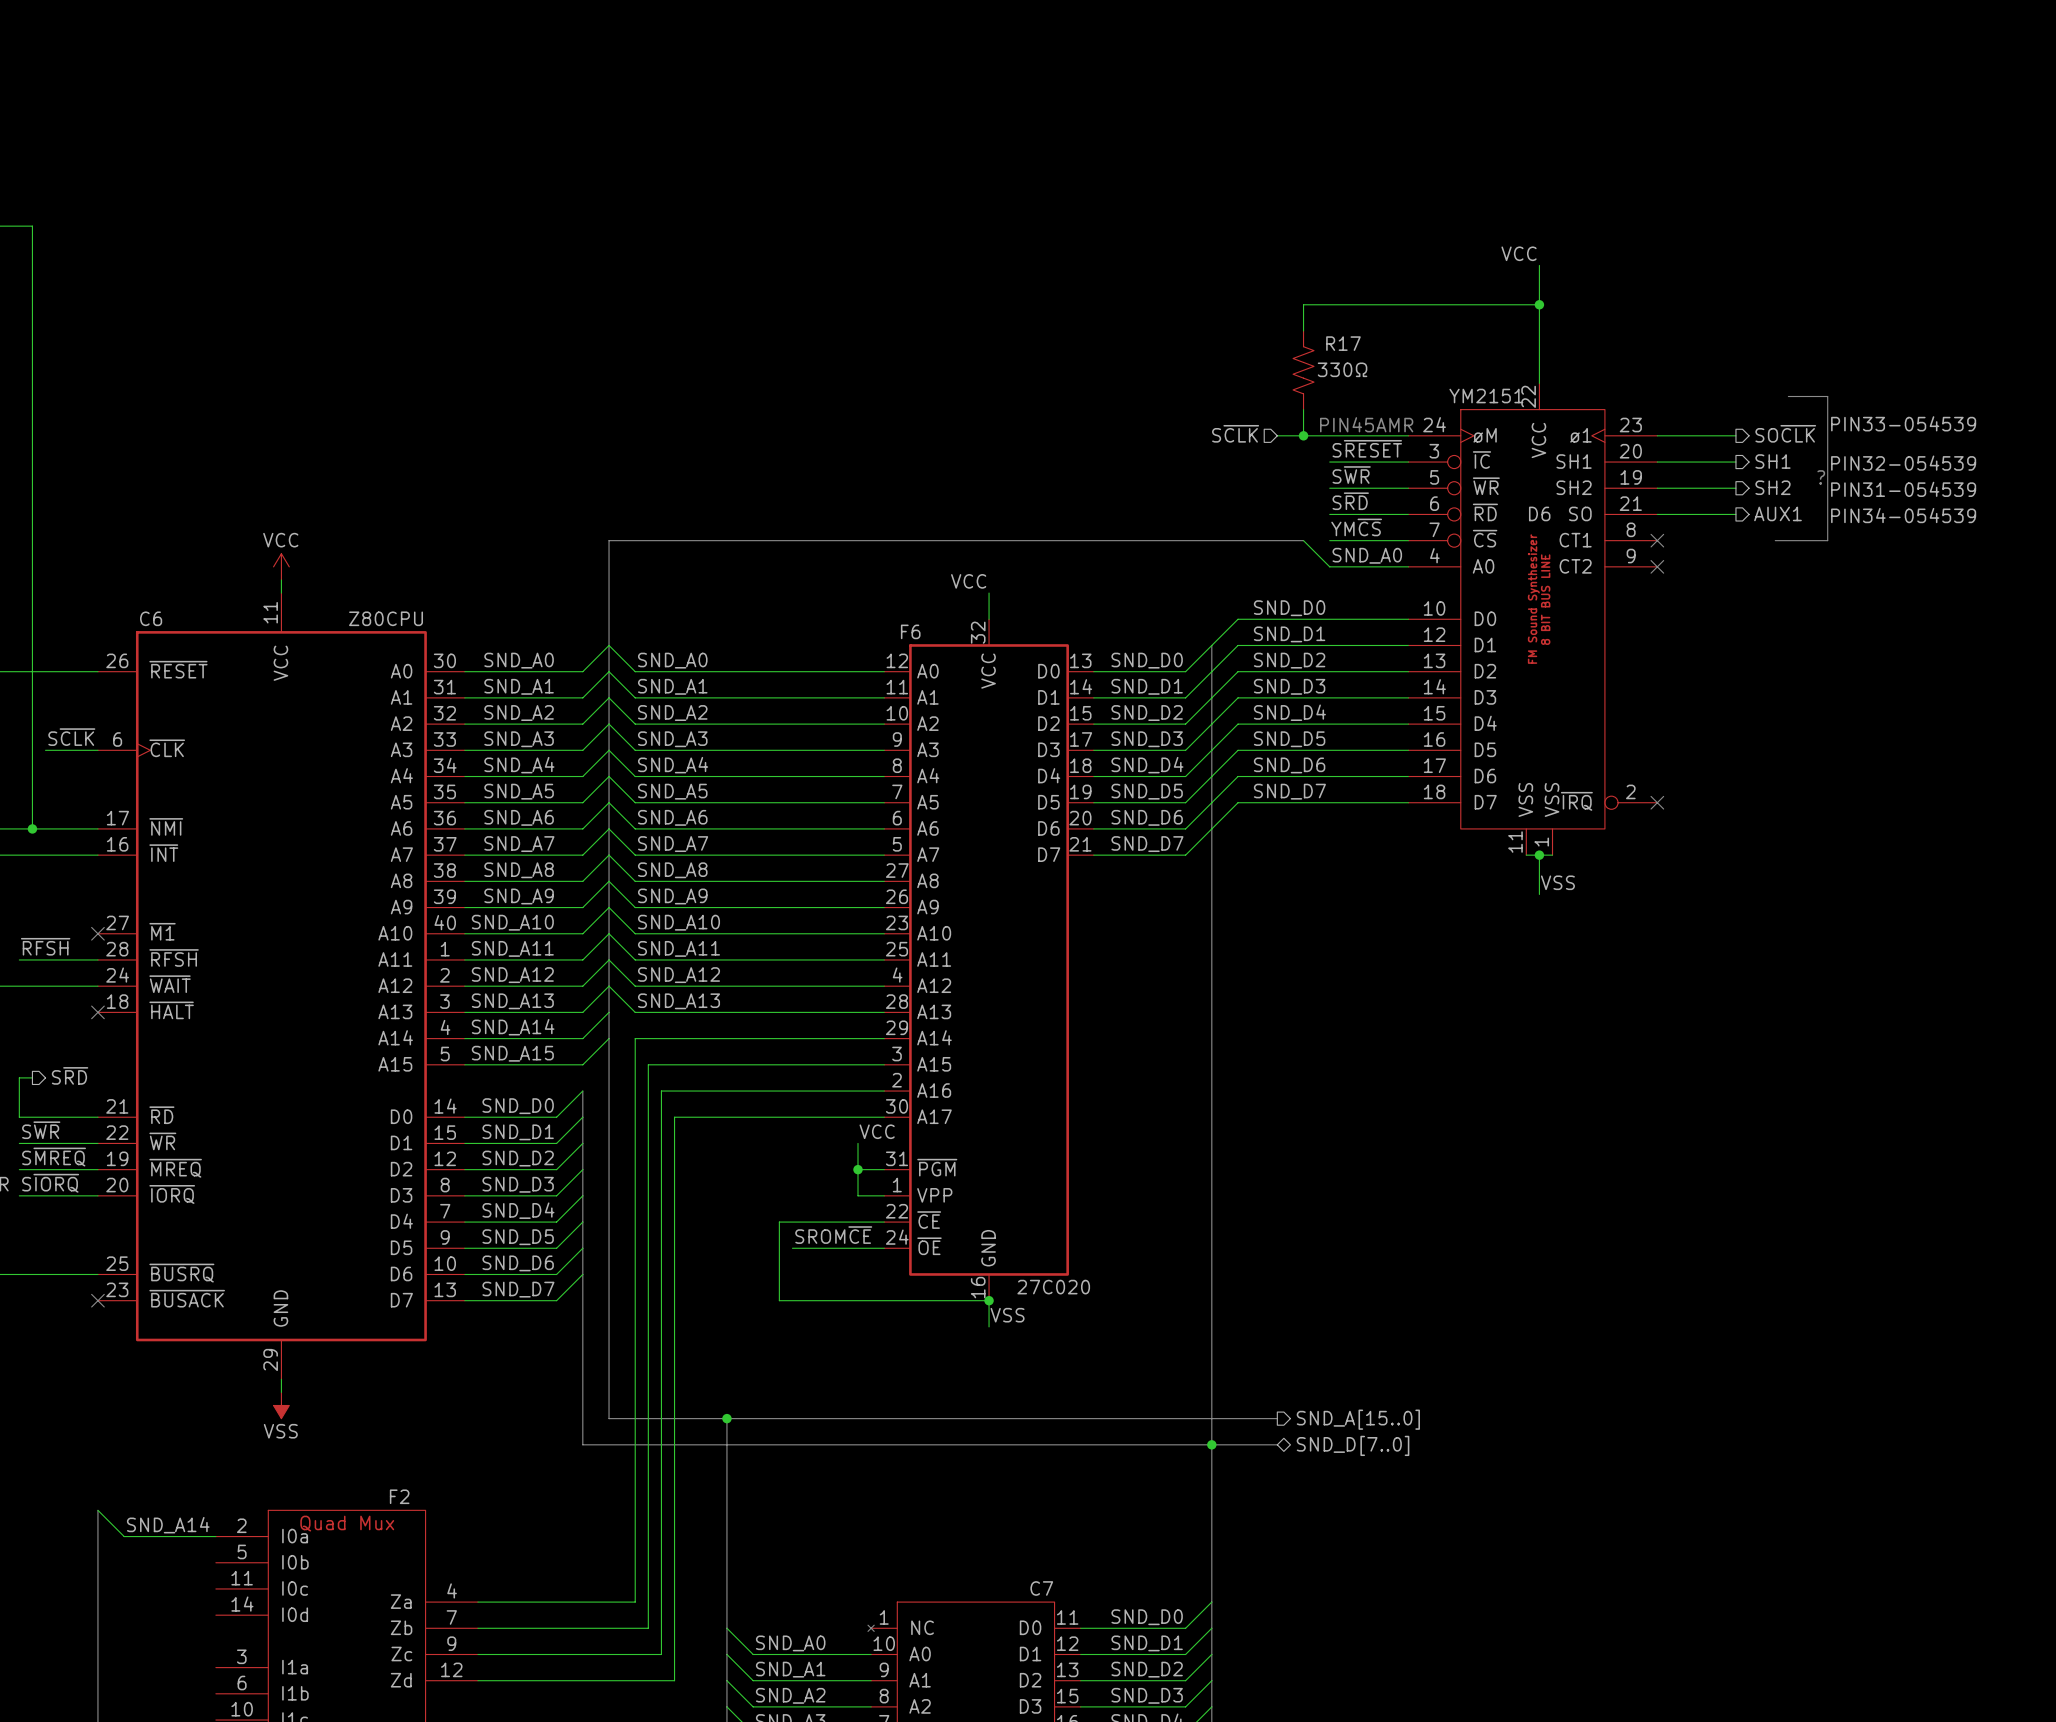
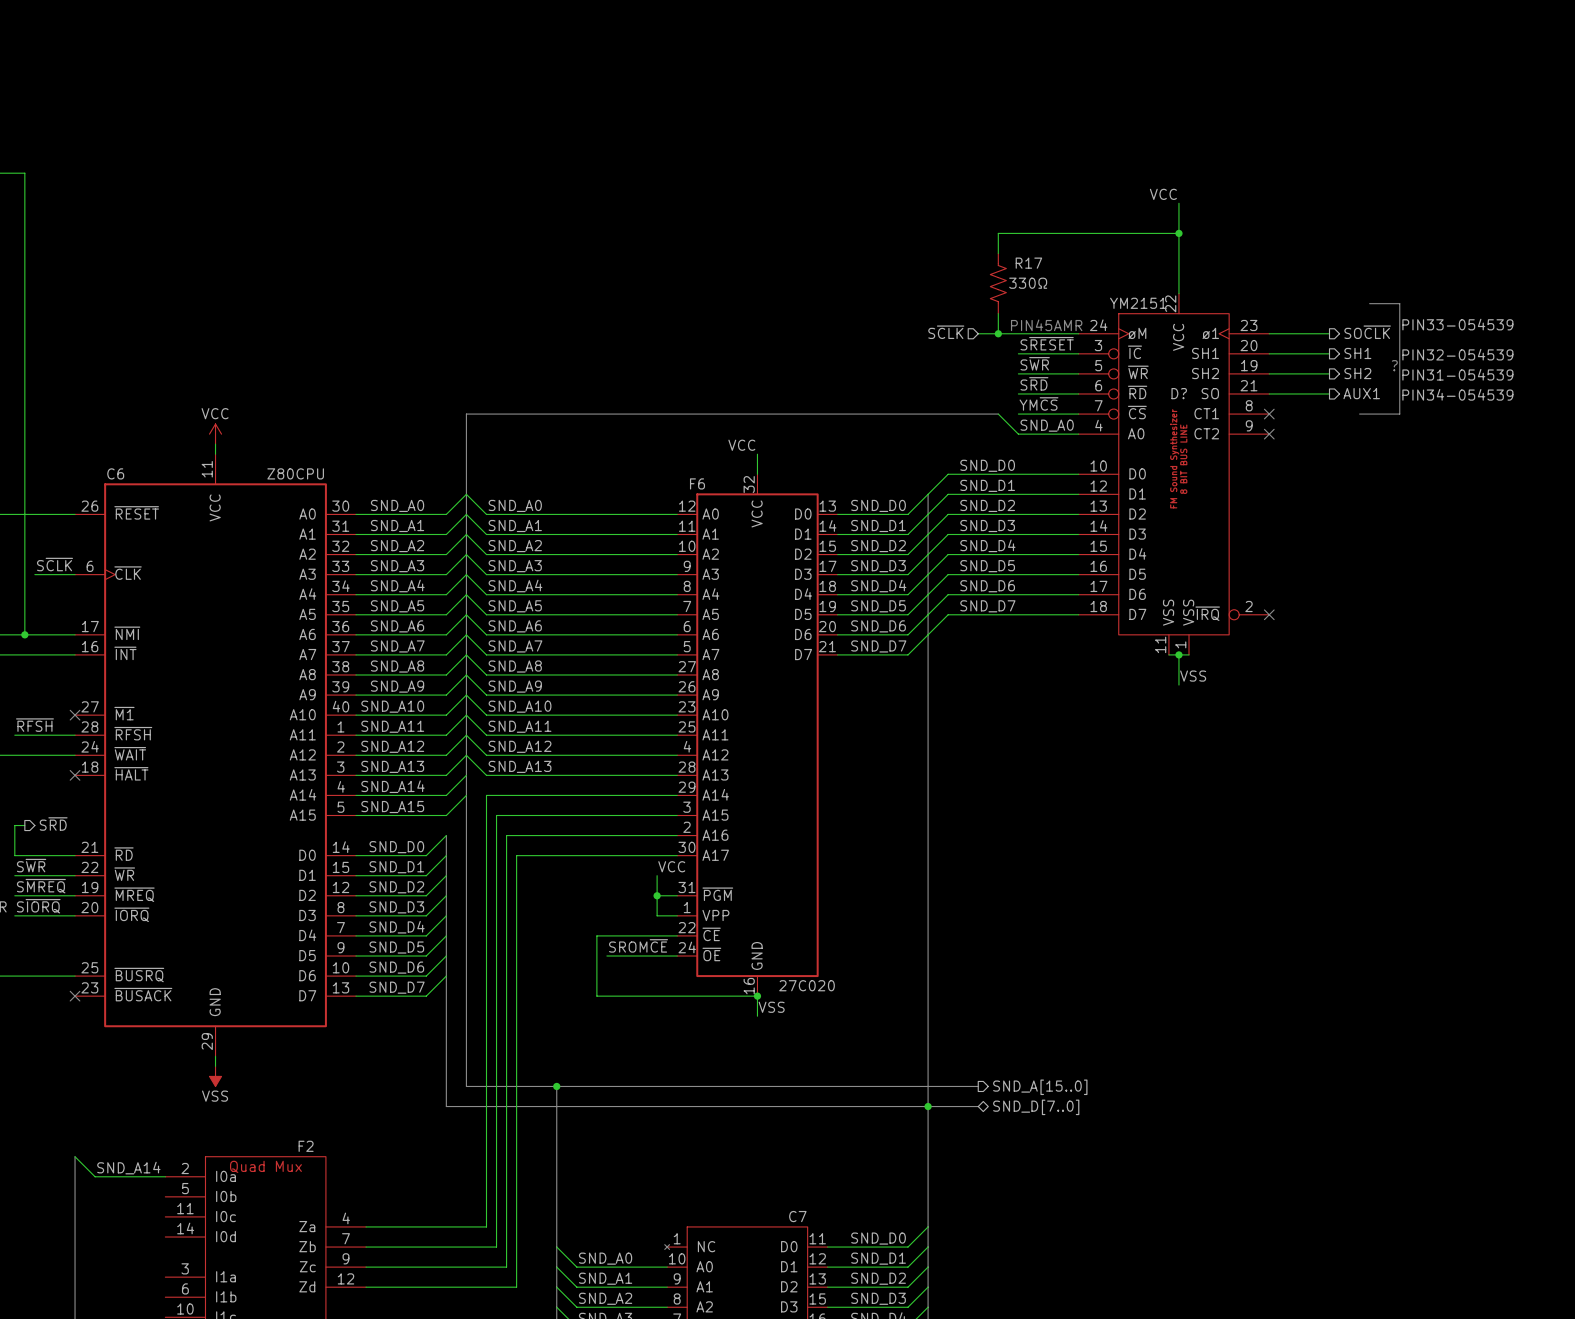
D6 name: D6 (1539, 513) -> D? (1179, 393)

